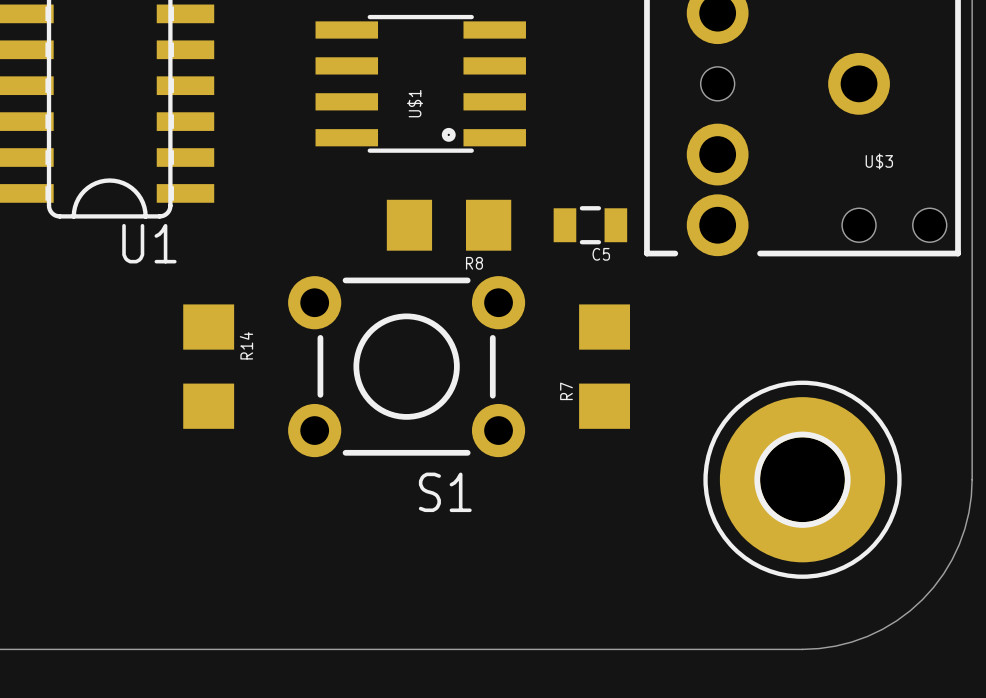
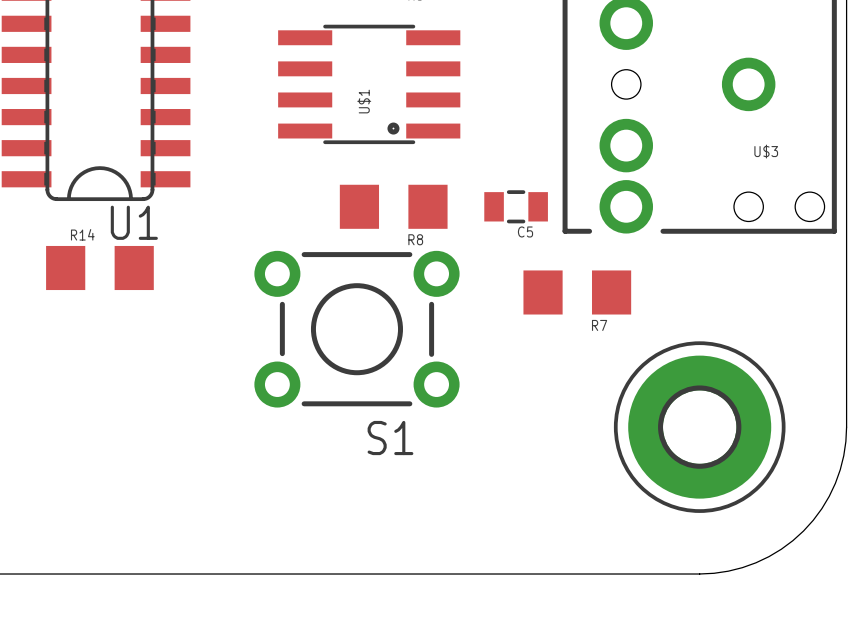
R14 name position: R14 (246, 345) -> R14 (82, 234)
R14 rotation: 0° (208, 366) -> 90° clockwise (99, 268)
R14 position: (208, 366) -> (99, 268)
R7 rotation: 0° (604, 366) -> 90° clockwise (577, 292)
R7 name position: R7 (566, 391) -> R7 (599, 325)

